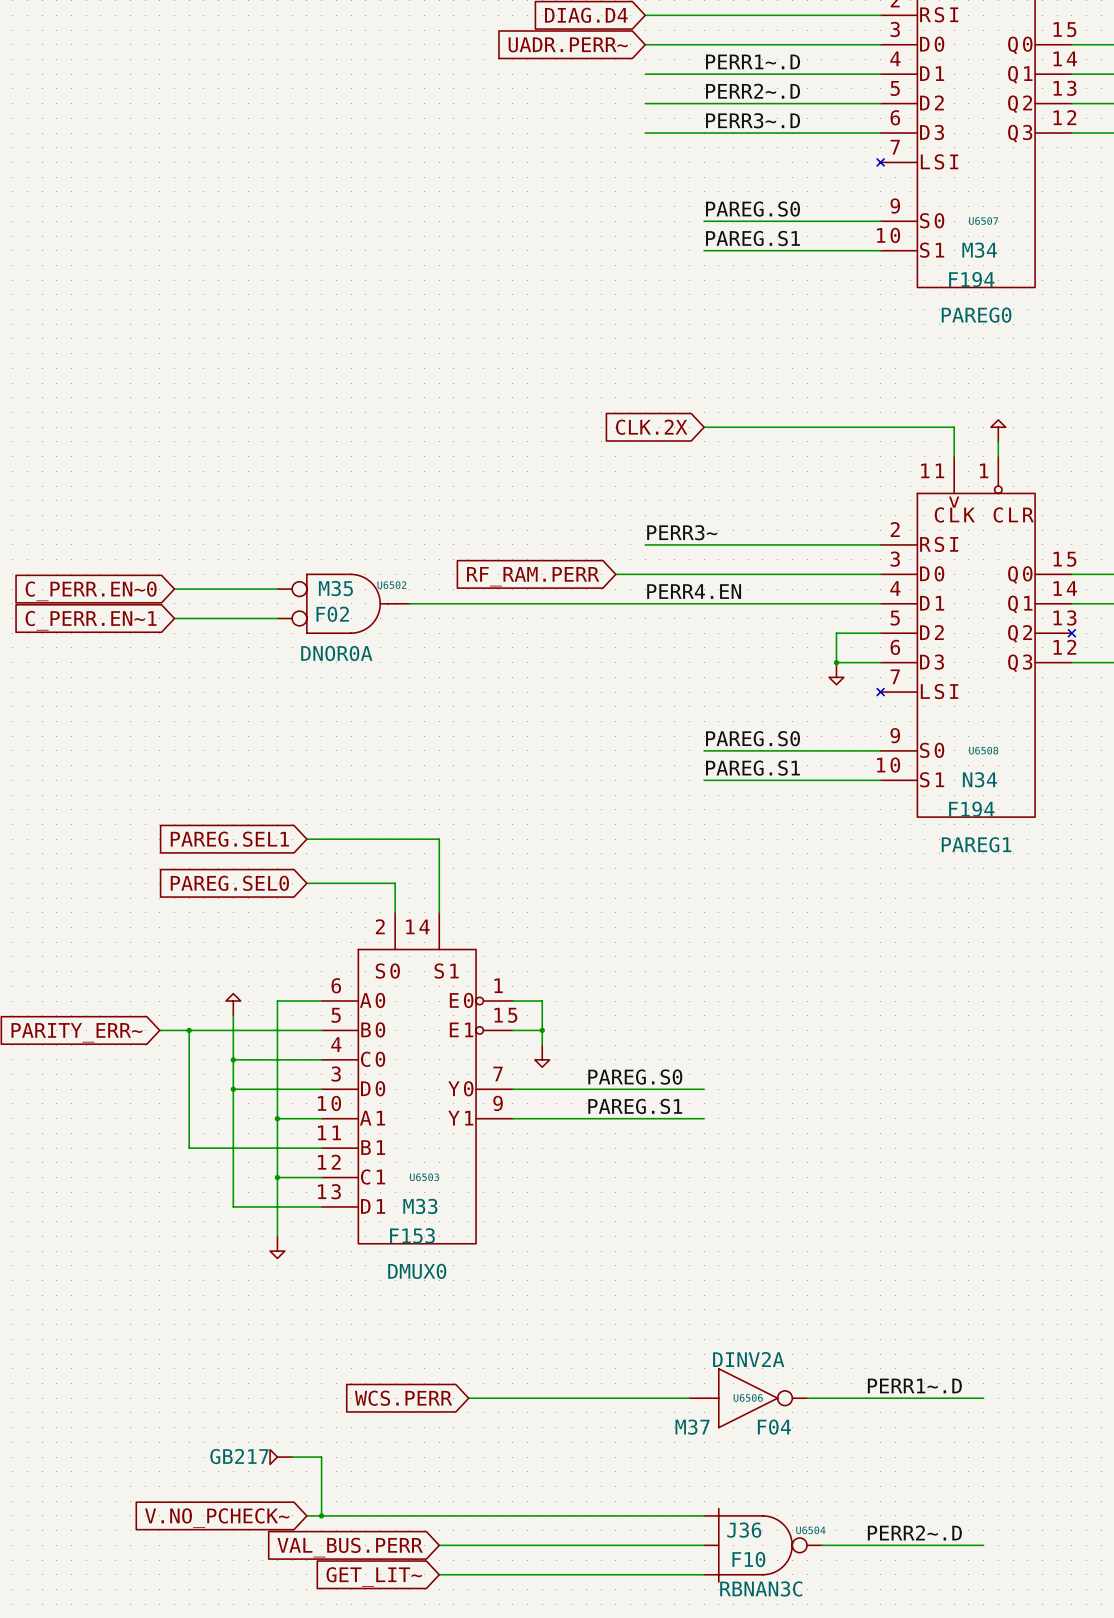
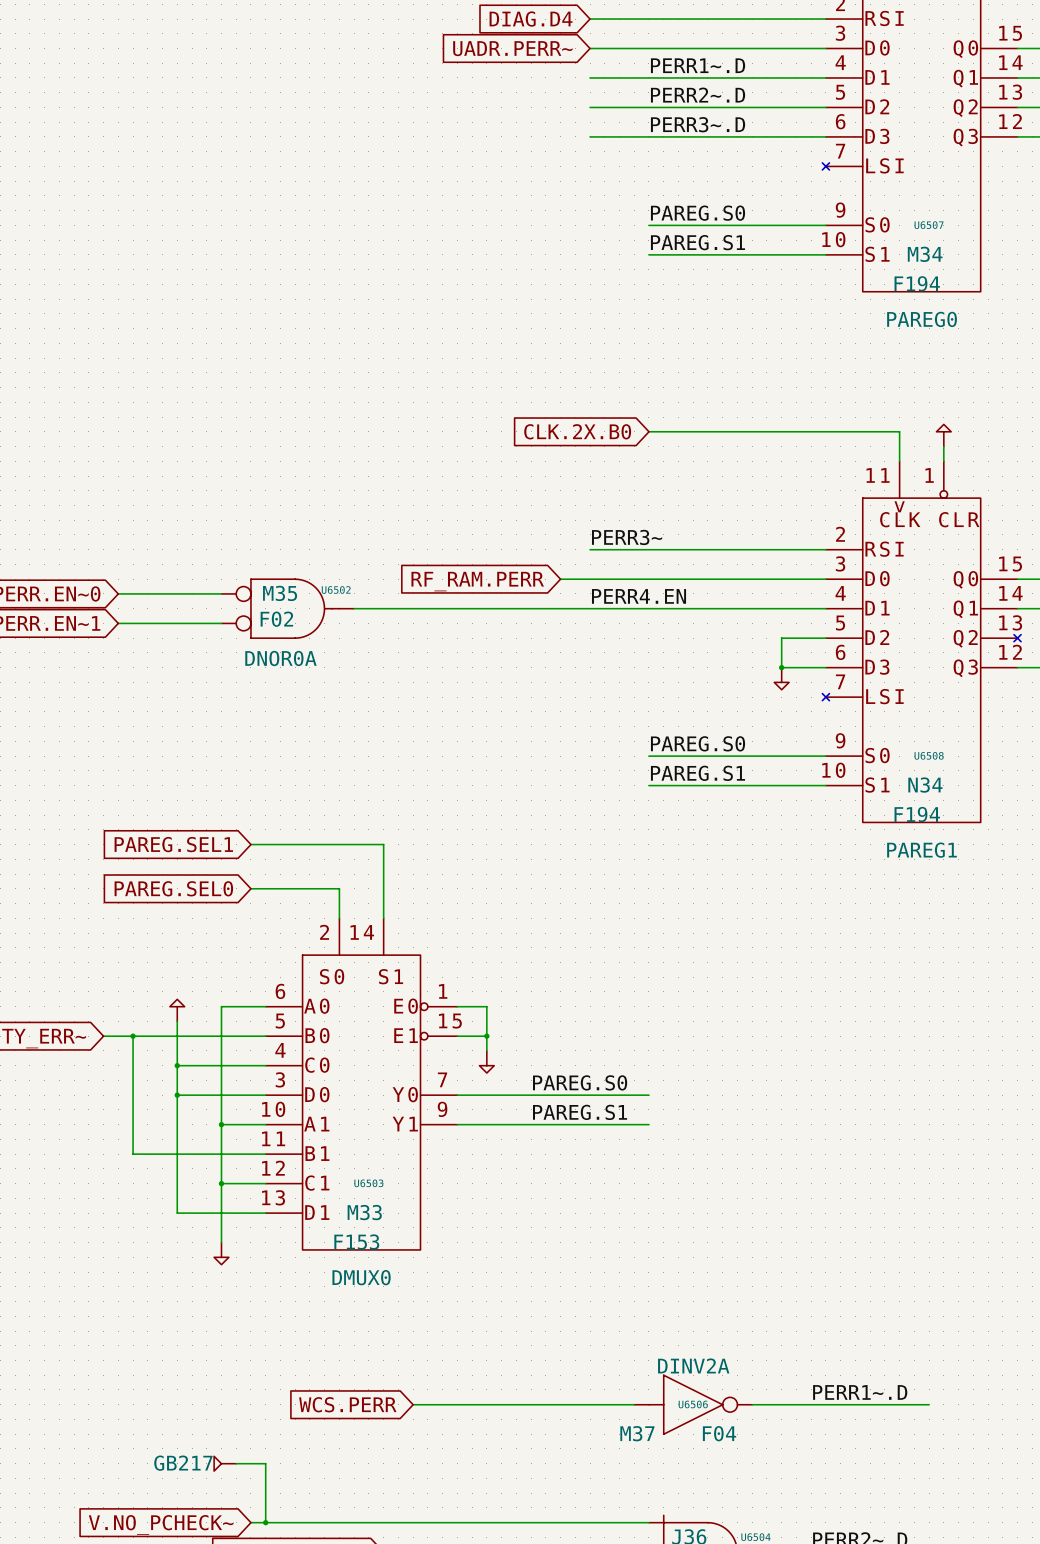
global label: CLK.2X (651, 427) -> CLK.2X.B0 (577, 431)

